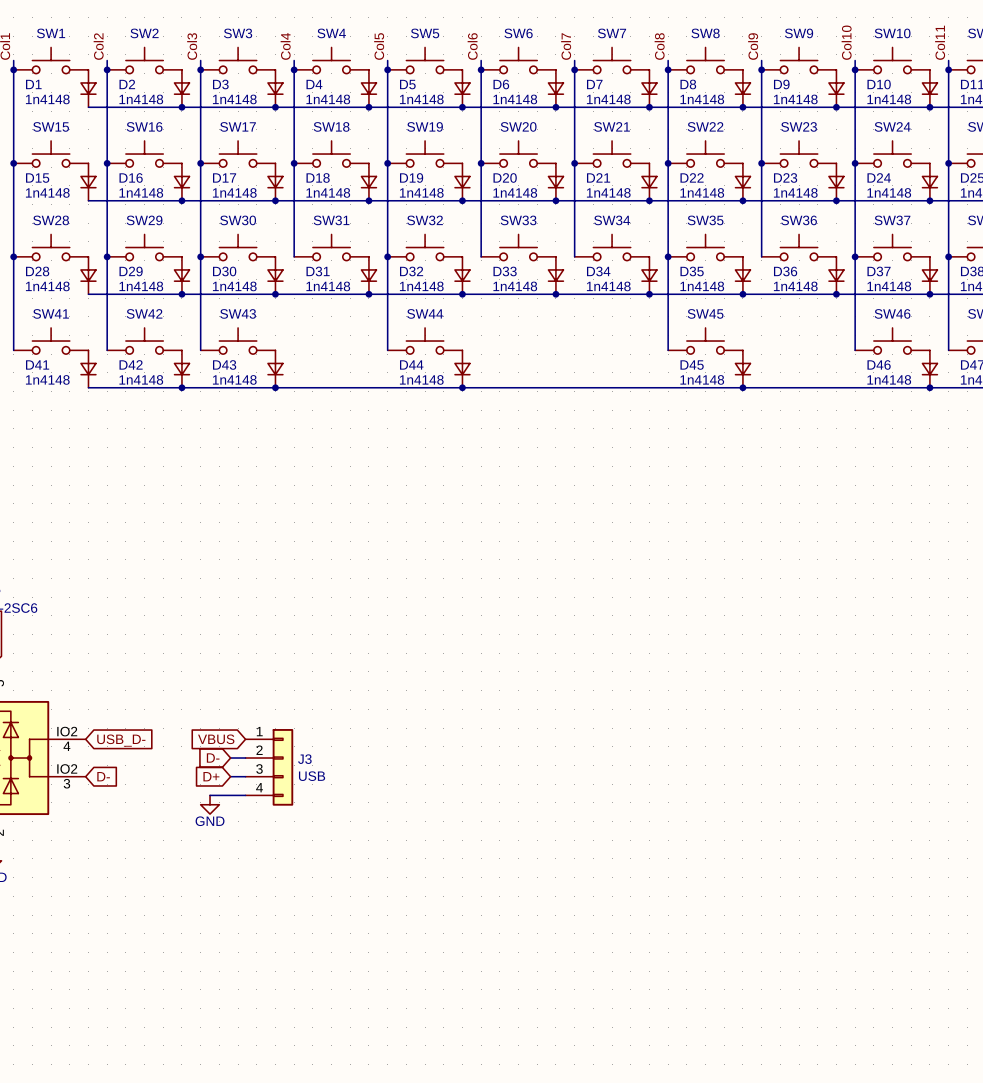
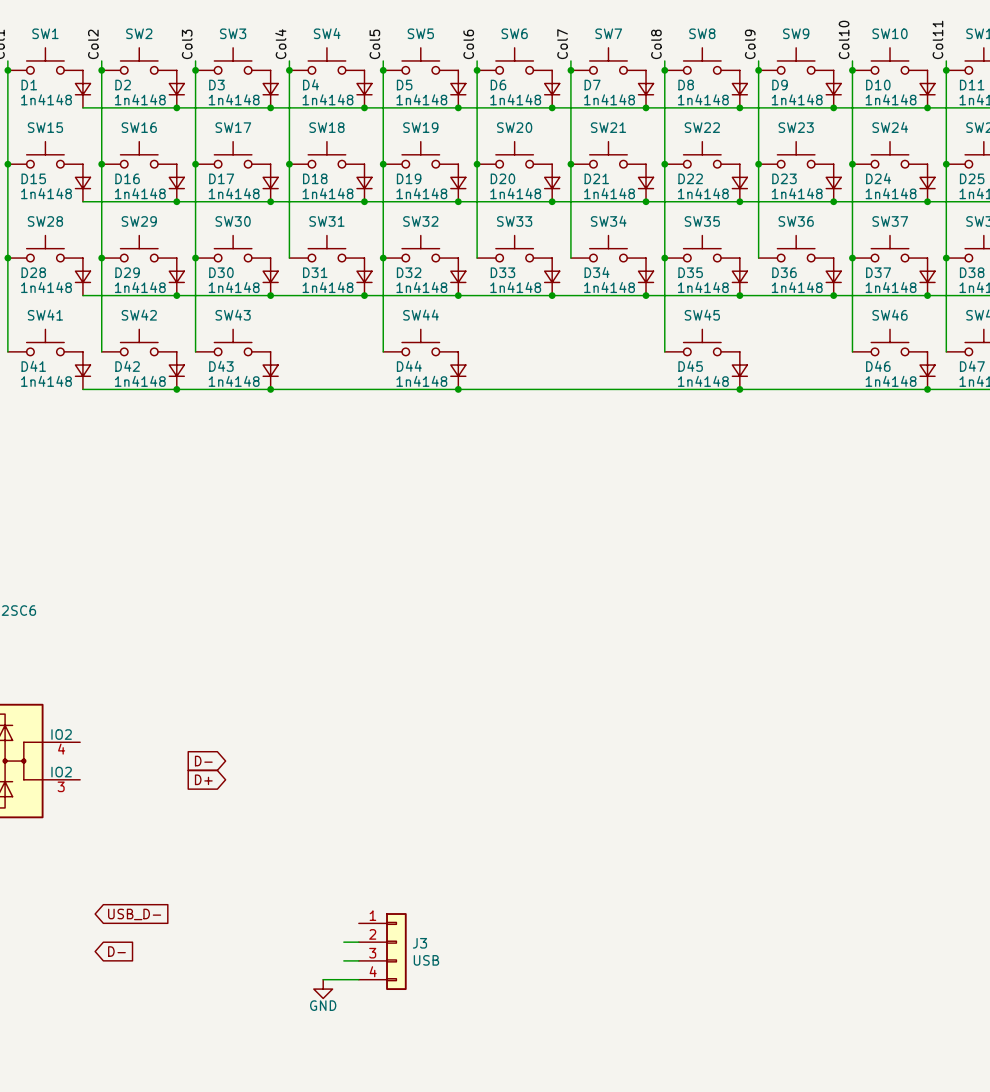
global label: VBUS (216, 739) -> none
global label position: USB_D- (121, 740) -> USB_D- (134, 914)
wire: (230, 758) (245, 758) -> none
J3 position: (269, 767) -> (382, 951)
global label position: D- (103, 776) -> D- (116, 951)
wire: (230, 776) (245, 776) -> none
wire: (210, 795) (245, 795) -> none
power symbol: GND (210, 804) -> none
wire: none -> (343, 942) (358, 942)
wire: none -> (343, 960) (358, 960)
wire: none -> (323, 979) (358, 979)
power symbol: none -> GND (323, 989)

